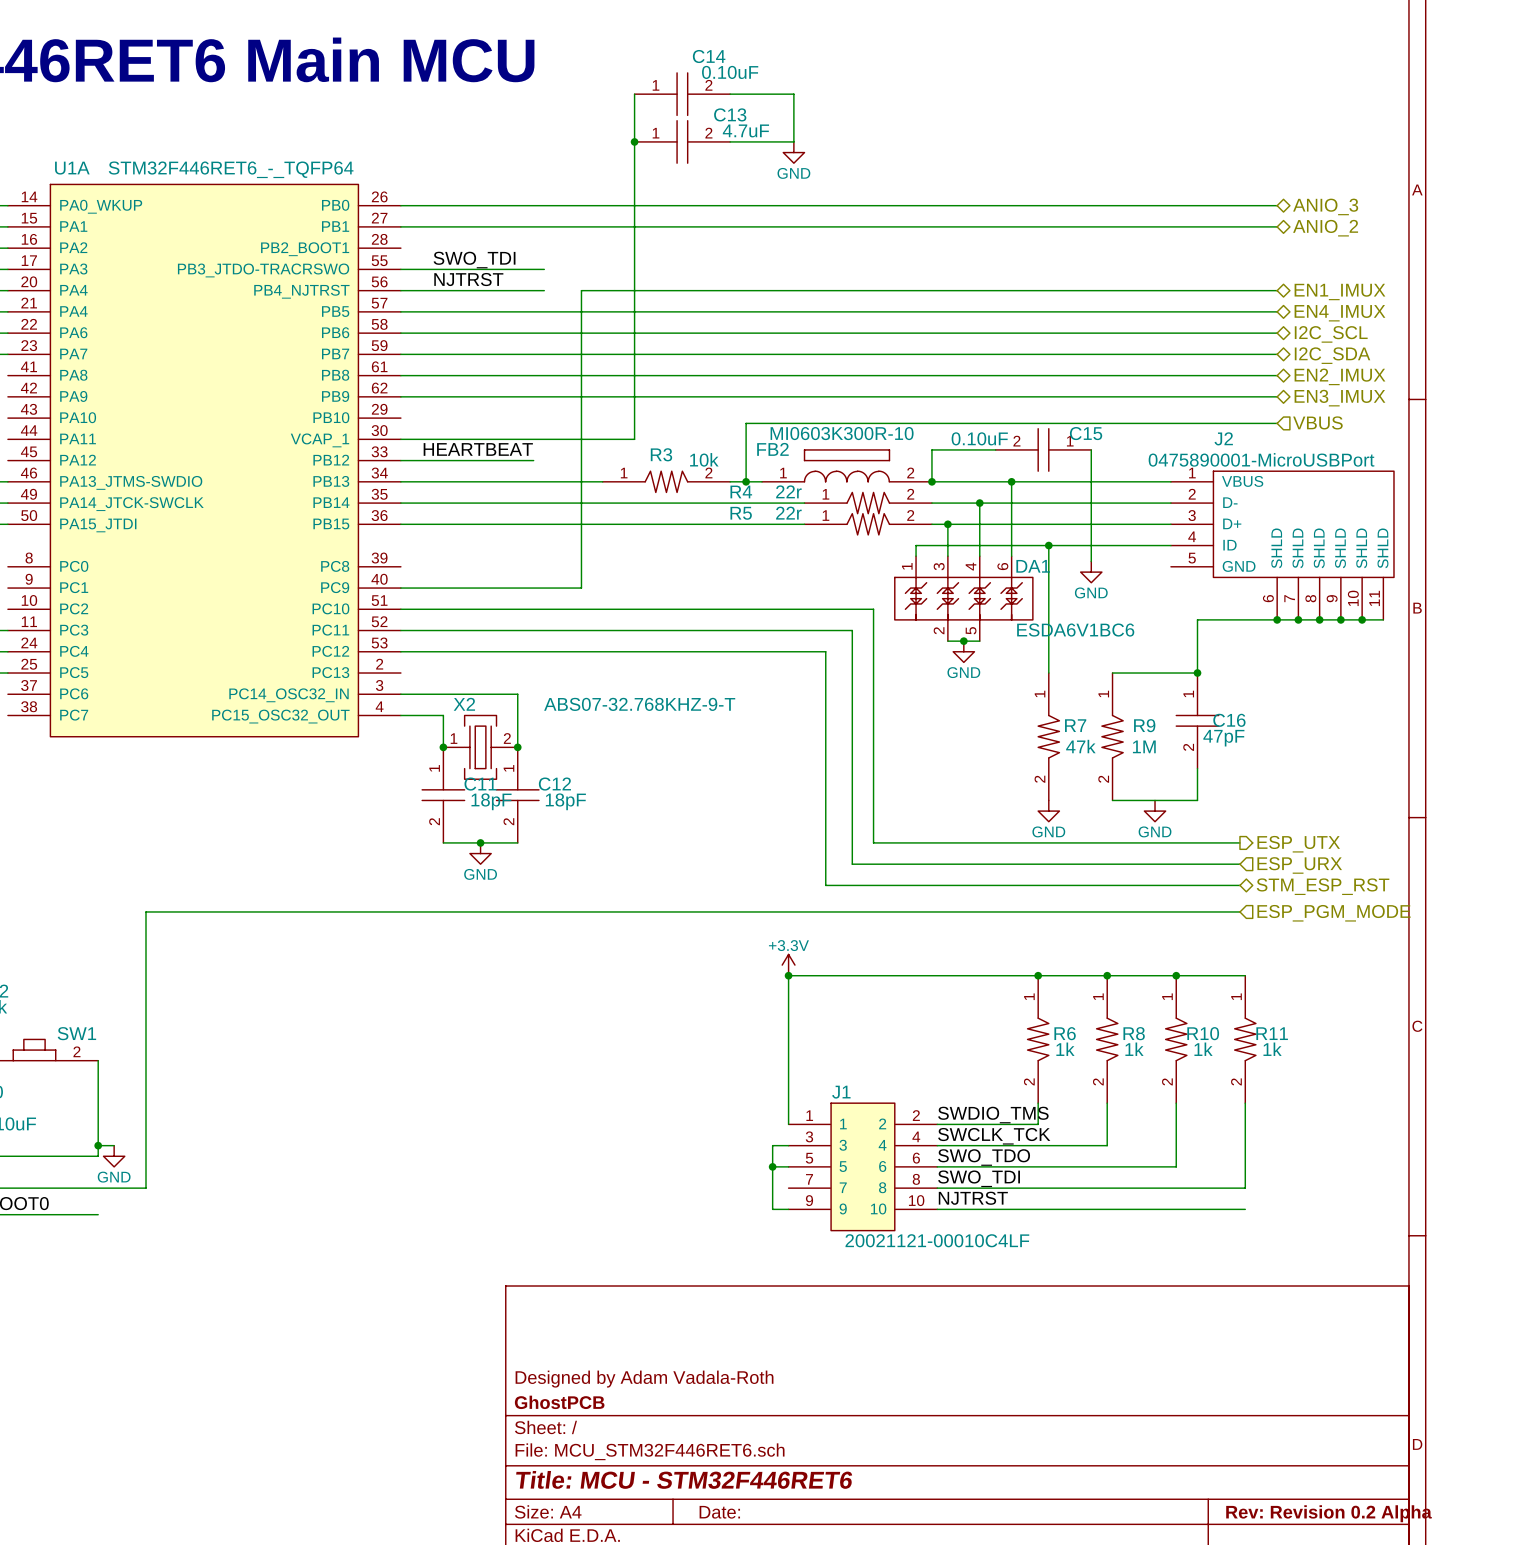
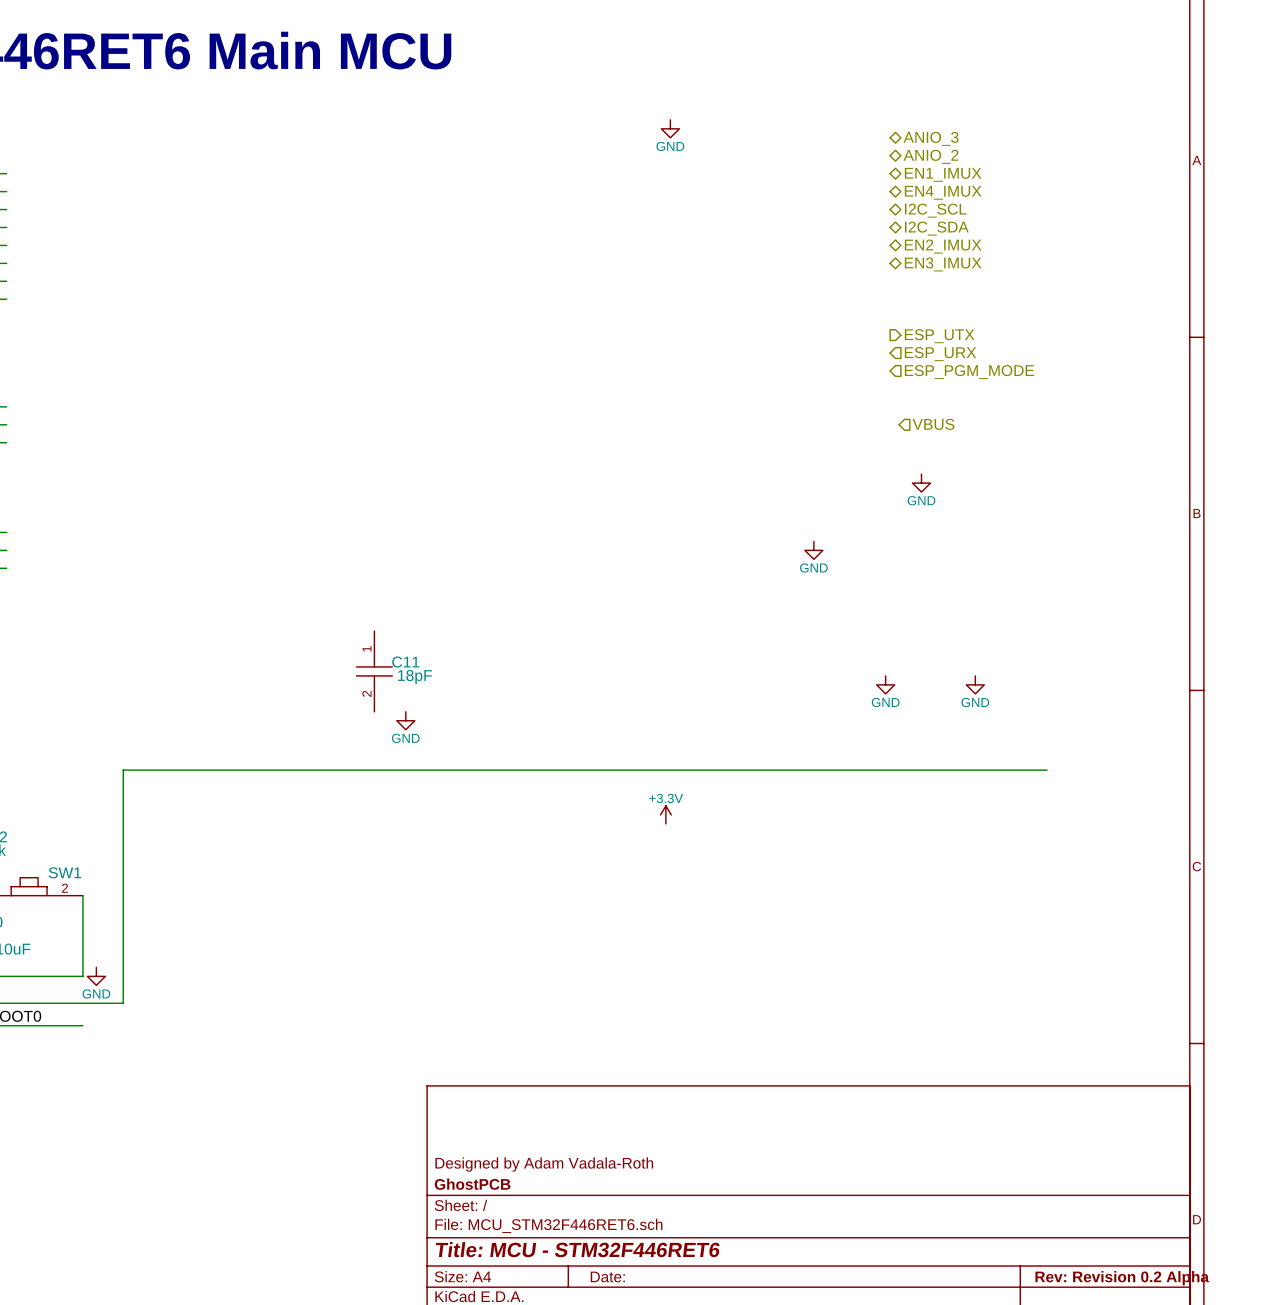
wire: (634, 94) (634, 439) (400, 439) -> none
C14: (682, 94) -> none
wire: (730, 94) (793, 94) (793, 141) (730, 141) -> none
junction: (634, 141) -> none
C13: (682, 141) -> none
hierarchical label: none -> ANIO_3 (931, 138)
hierarchical label: none -> ANIO_2 (931, 156)
wire: (400, 205) (1277, 205) -> none
hierarchical label: ANIO_3 (1325, 206) -> none
hierarchical label: none -> EN1_IMUX (943, 174)
wire: (400, 226) (1277, 226) -> none
hierarchical label: none -> EN4_IMUX (943, 192)
hierarchical label: ANIO_2 (1325, 228) -> none
hierarchical label: none -> I2C_SCL (935, 210)
label: SWO_TDI (474, 260) -> none
wire: (400, 269) (544, 269) -> none
hierarchical label: none -> I2C_SDA (936, 228)
label: NJTRST (468, 279) -> none
wire: (400, 290) (544, 290) -> none
wire: (1277, 290) (581, 290) (581, 588) (400, 588) -> none
hierarchical label: none -> EN2_IMUX (943, 246)
hierarchical label: EN1_IMUX (1339, 292) -> none
wire: (400, 311) (1277, 311) -> none
hierarchical label: none -> EN3_IMUX (943, 264)
hierarchical label: EN4_IMUX (1339, 313) -> none
wire: (400, 333) (1277, 333) -> none
hierarchical label: I2C_SCL (1331, 334) -> none
wire: (400, 354) (1277, 354) -> none
hierarchical label: I2C_SDA (1332, 355) -> none
wire: (400, 375) (1277, 375) -> none
hierarchical label: EN2_IMUX (1339, 376) -> none
wire: (400, 396) (1277, 396) -> none
hierarchical label: none -> ESP_UTX (939, 336)
hierarchical label: EN3_IMUX (1339, 398) -> none
hierarchical label: none -> ESP_URX (940, 354)
hierarchical label: VBUS (1317, 422) -> none
wire: (1277, 423) (746, 423) (746, 481) -> none
hierarchical label: none -> ESP_PGM_MODE (969, 372)
label: HEARTBEAT (478, 449) -> none
wire: (995, 449) (931, 449) (931, 481) (1170, 481) -> none
C15: (1043, 449) -> none
wire: (1091, 449) (1091, 561) -> none
wire: (400, 460) (533, 460) -> none
FB2: MI0603K300R-10 (846, 465) -> none
wire: (400, 481) (602, 481) -> none
R3: (666, 481) -> none
wire: (730, 481) (762, 481) -> none
junction: (746, 481) -> none
junction: (931, 481) -> none
wire: (1011, 481) (1011, 556) -> none
junction: (1011, 481) -> none
U1A: STM32F446RET6_-_TQFP64 (204, 487) -> none
hierarchical label: none -> VBUS (933, 424)
wire: (400, 503) (804, 503) -> none
R4: (868, 503) -> none
wire: (931, 503) (1170, 503) -> none
wire: (979, 503) (979, 556) -> none
junction: (979, 503) -> none
wire: (400, 524) (804, 524) -> none
R5: (868, 524) -> none
wire: (931, 524) (1170, 524) -> none
wire: (947, 524) (947, 556) -> none
junction: (947, 524) -> none
wire: (1048, 545) (1048, 673) -> none
junction: (1048, 545) -> none
wire: (1170, 545) (916, 545) (916, 556) -> none
J2: 0475890001-MicroUSBPort (1282, 545) -> none
DA1: ESDA6V1BC6 (963, 598) -> none
wire: (400, 609) (873, 609) (873, 842) (1239, 842) -> none
junction: (1277, 619) -> none
junction: (1298, 619) -> none
junction: (1319, 619) -> none
junction: (1340, 619) -> none
junction: (1362, 619) -> none
wire: (1383, 619) (1197, 619) (1197, 673) (1112, 673) -> none
wire: (400, 630) (852, 630) (852, 864) (1239, 864) -> none
wire: (947, 641) (979, 641) -> none
junction: (963, 641) -> none
wire: (400, 651) (825, 651) (825, 885) (1239, 885) -> none
junction: (1197, 673) -> none
wire: (400, 694) (517, 694) (517, 747) -> none
wire: (400, 715) (443, 715) (443, 747) -> none
C16: (1197, 720) -> none
R7: (1048, 736) -> none
R9: (1112, 736) -> none
junction: (443, 747) -> none
X2: ABS07-32.768KHZ-9-T (480, 747) -> none
junction: (517, 747) -> none
wire: (1197, 768) (1197, 800) (1112, 800) -> none
C12: (517, 795) -> none
wire: (443, 842) (517, 842) -> none
junction: (480, 842) -> none
hierarchical label: ESP_UTX (1298, 844) -> none
hierarchical label: ESP_URX (1299, 865) -> none
hierarchical label: STM_ESP_RST (1323, 886) -> none
hierarchical label: ESP_PGM_MODE (1334, 913) -> none
junction: (788, 975) -> none
junction: (1038, 975) -> none
junction: (1107, 975) -> none
junction: (1176, 975) -> none
wire: (1245, 975) (788, 975) (788, 1124) -> none
R6: (1038, 1039) -> none
R8: (1107, 1039) -> none
R10: (1176, 1039) -> none
R11: (1245, 1039) -> none
wire: (1038, 1103) (1038, 1124) (937, 1124) -> none
wire: (1107, 1103) (1107, 1145) (937, 1145) -> none
wire: (1176, 1103) (1176, 1166) (937, 1166) -> none
wire: (1245, 1103) (1245, 1188) (937, 1188) -> none
label: SWDIO_TMS (993, 1115) -> none
label: SWCLK_TCK (994, 1136) -> none
wire: (98, 1145) (114, 1145) -> none
junction: (98, 1145) -> none
wire: (788, 1145) (772, 1145) (772, 1209) (788, 1209) -> none
label: SWO_TDO (984, 1157) -> none
wire: (772, 1166) (788, 1166) -> none
junction: (772, 1166) -> none
J1: 20021121-00010C4LF (862, 1166) -> none
label: SWO_TDI (979, 1178) -> none
label: NJTRST (973, 1198) -> none
wire: (937, 1209) (1245, 1209) -> none

